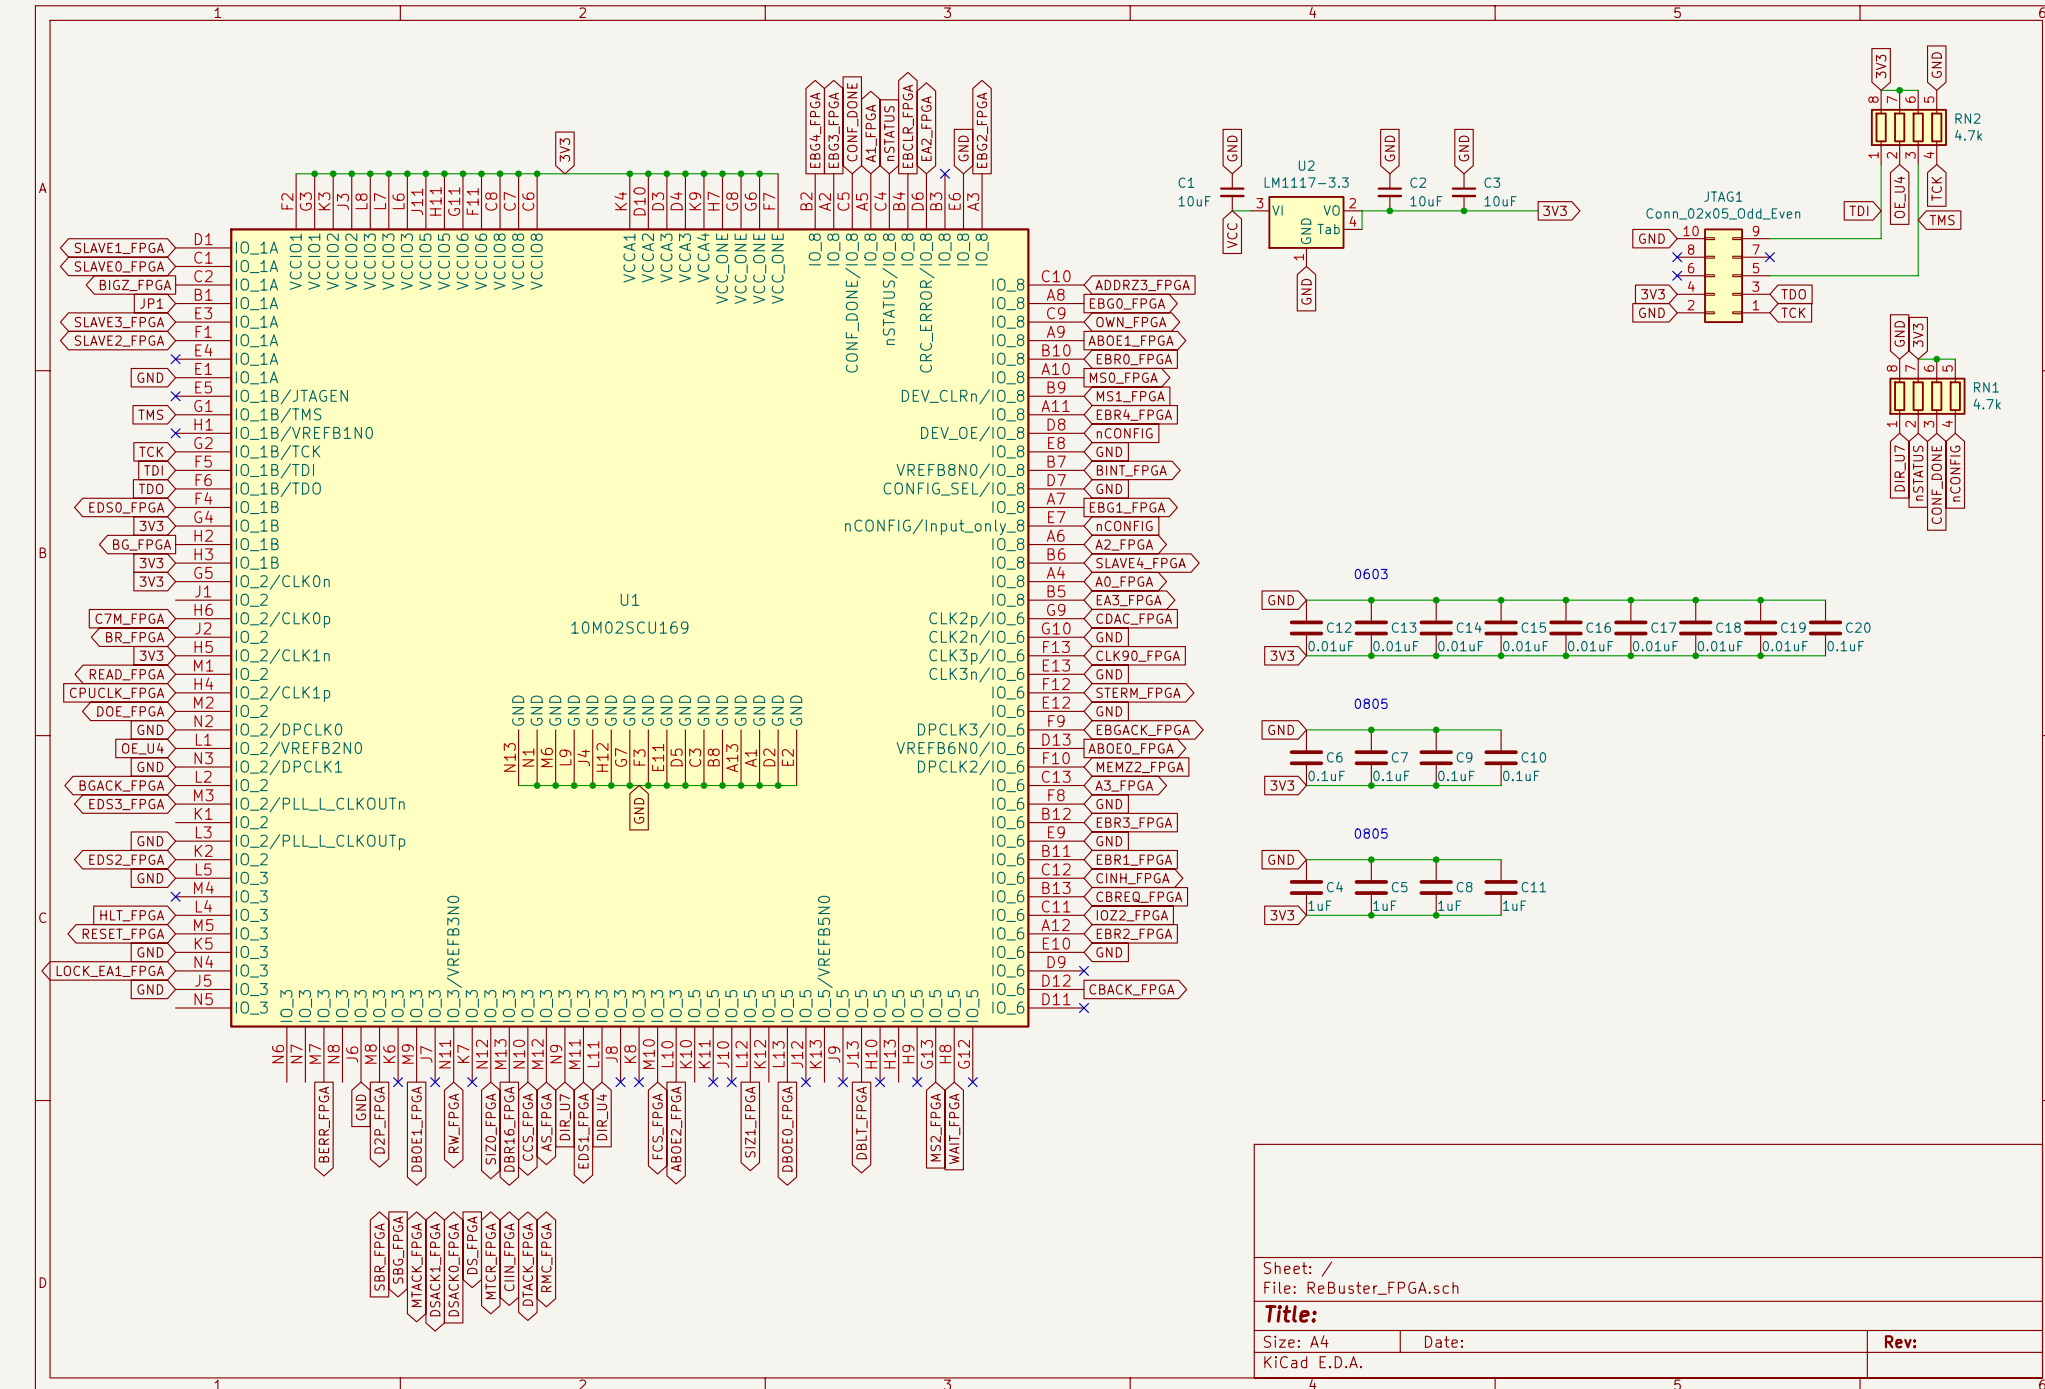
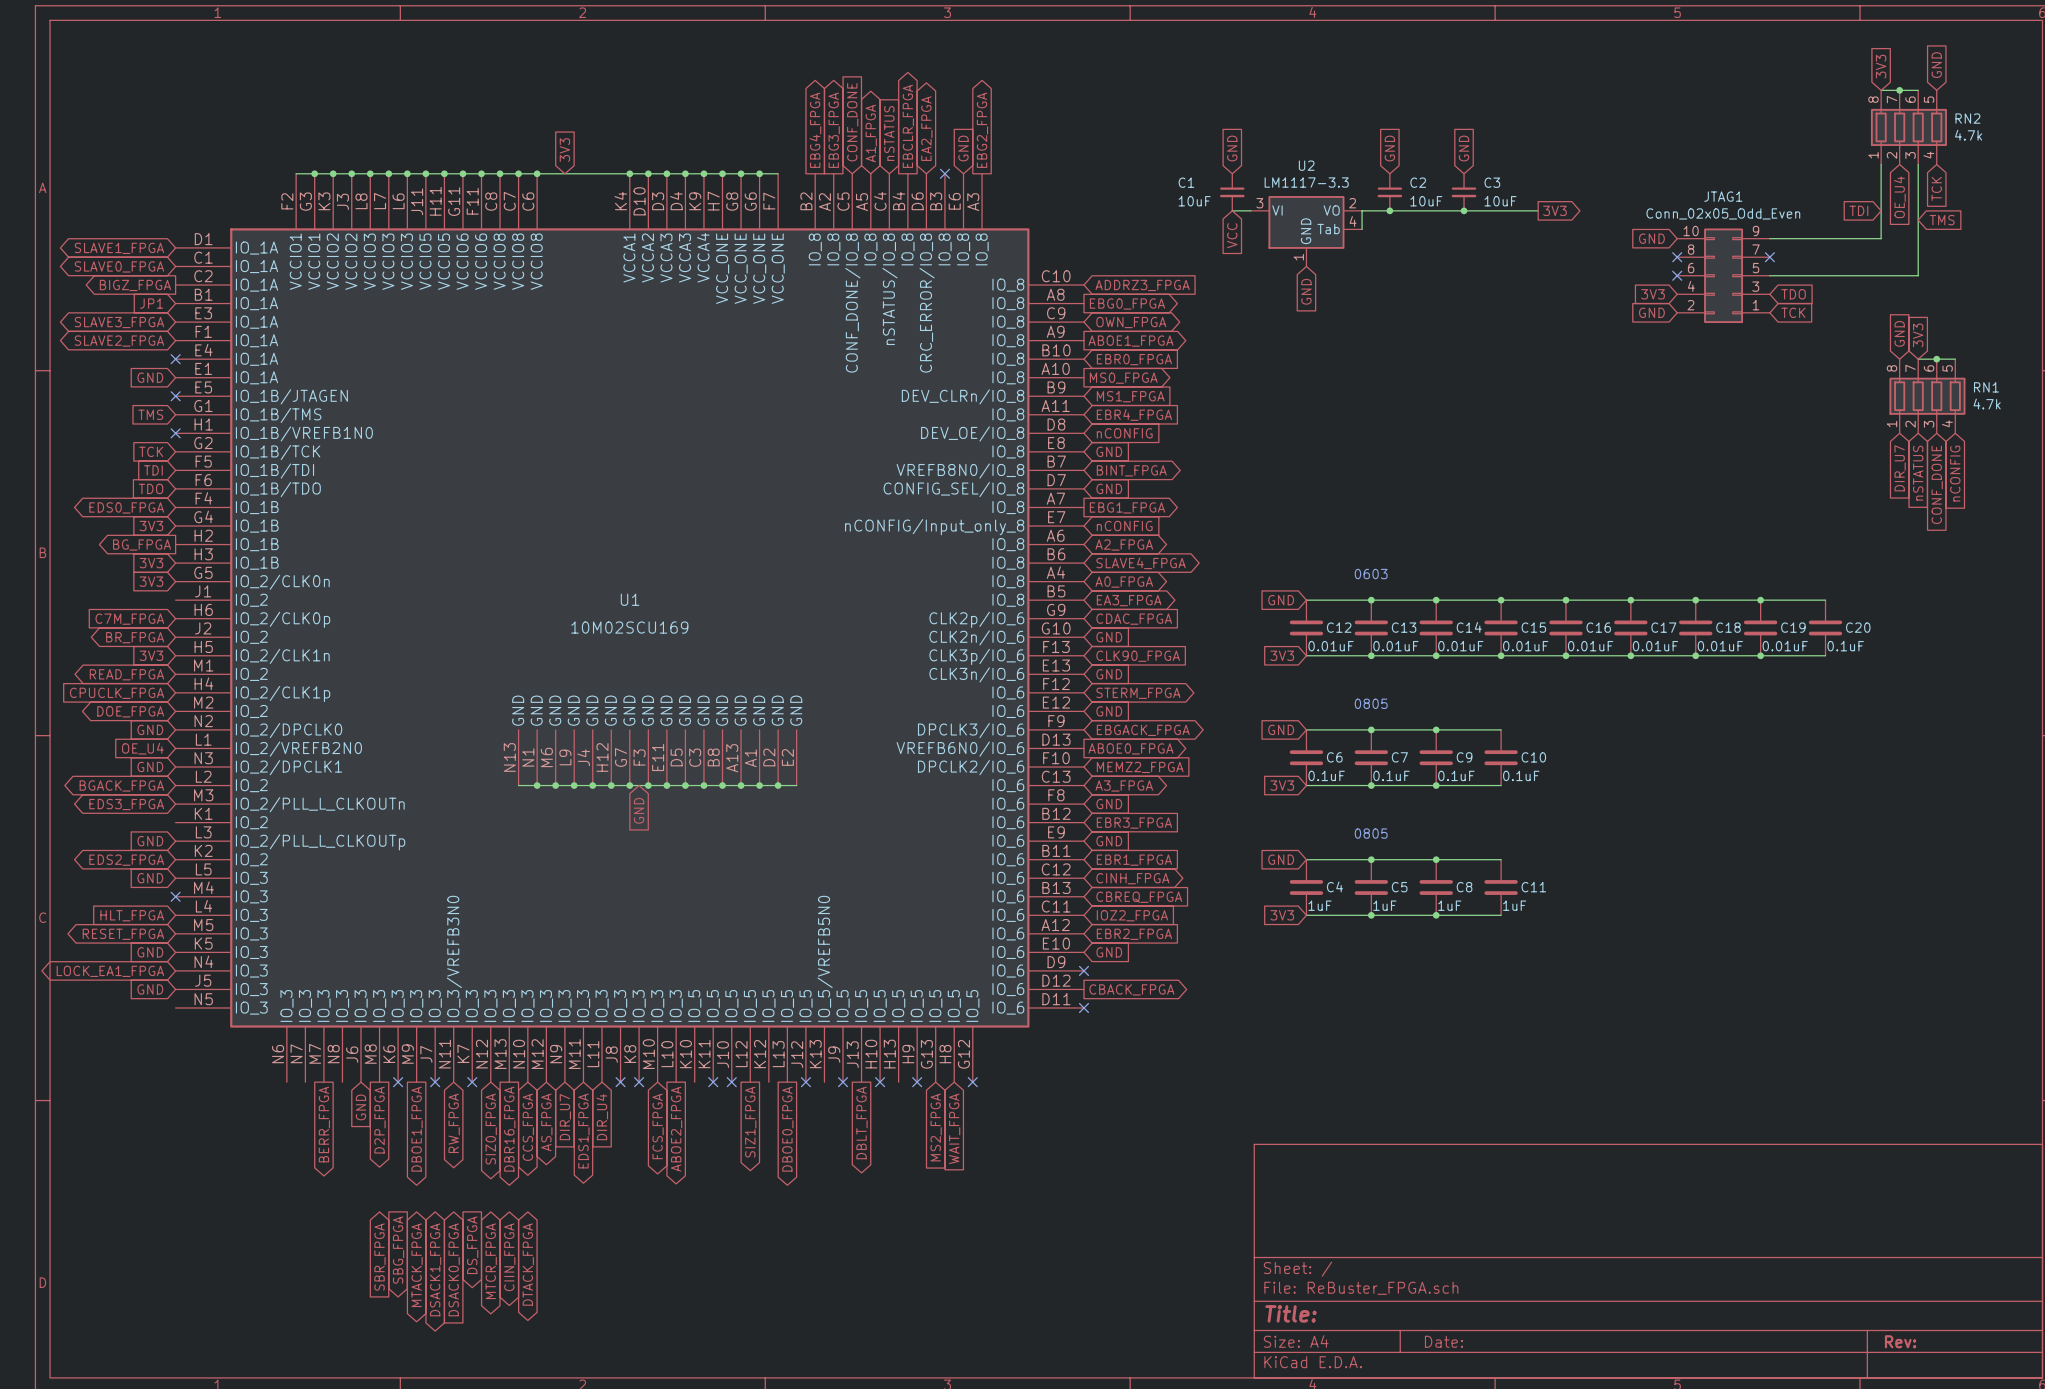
global label: RMC_FPGA (546, 1257) -> none

